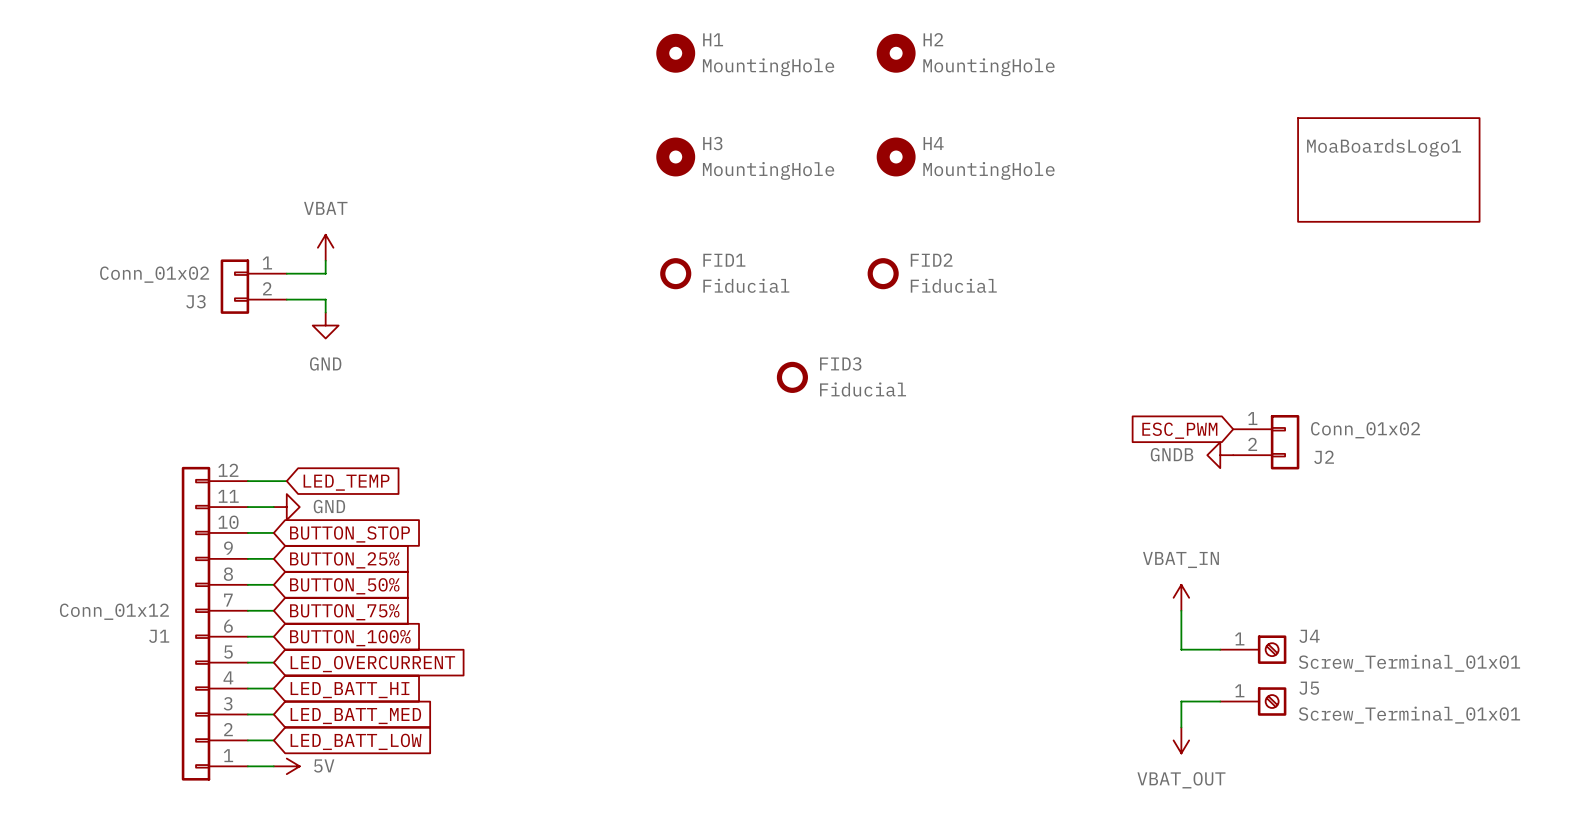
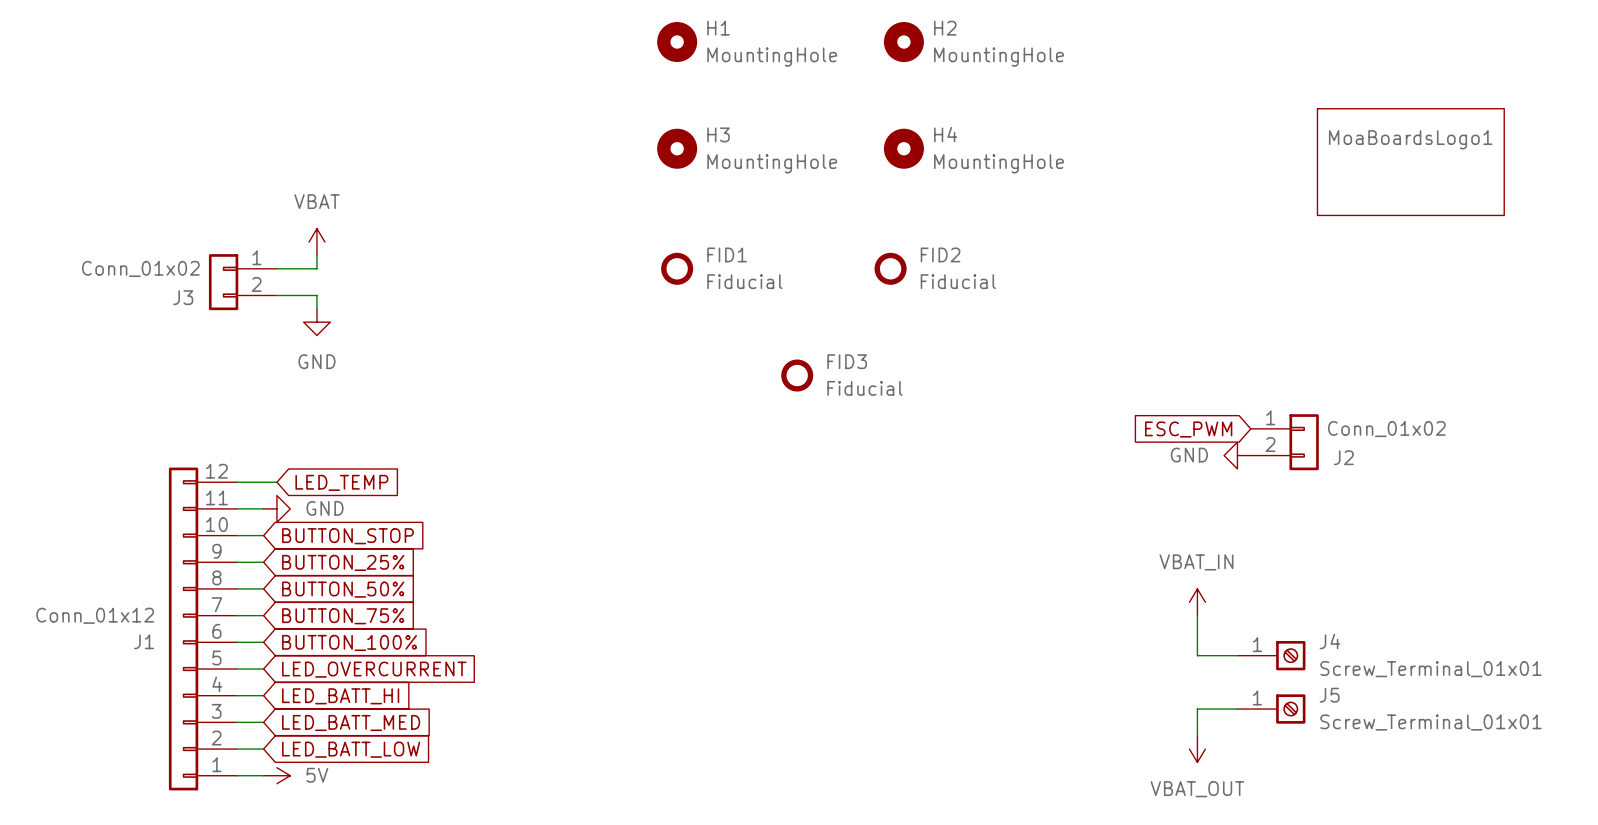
power symbol: GNDB (1220, 455) -> GND (1237, 455)

